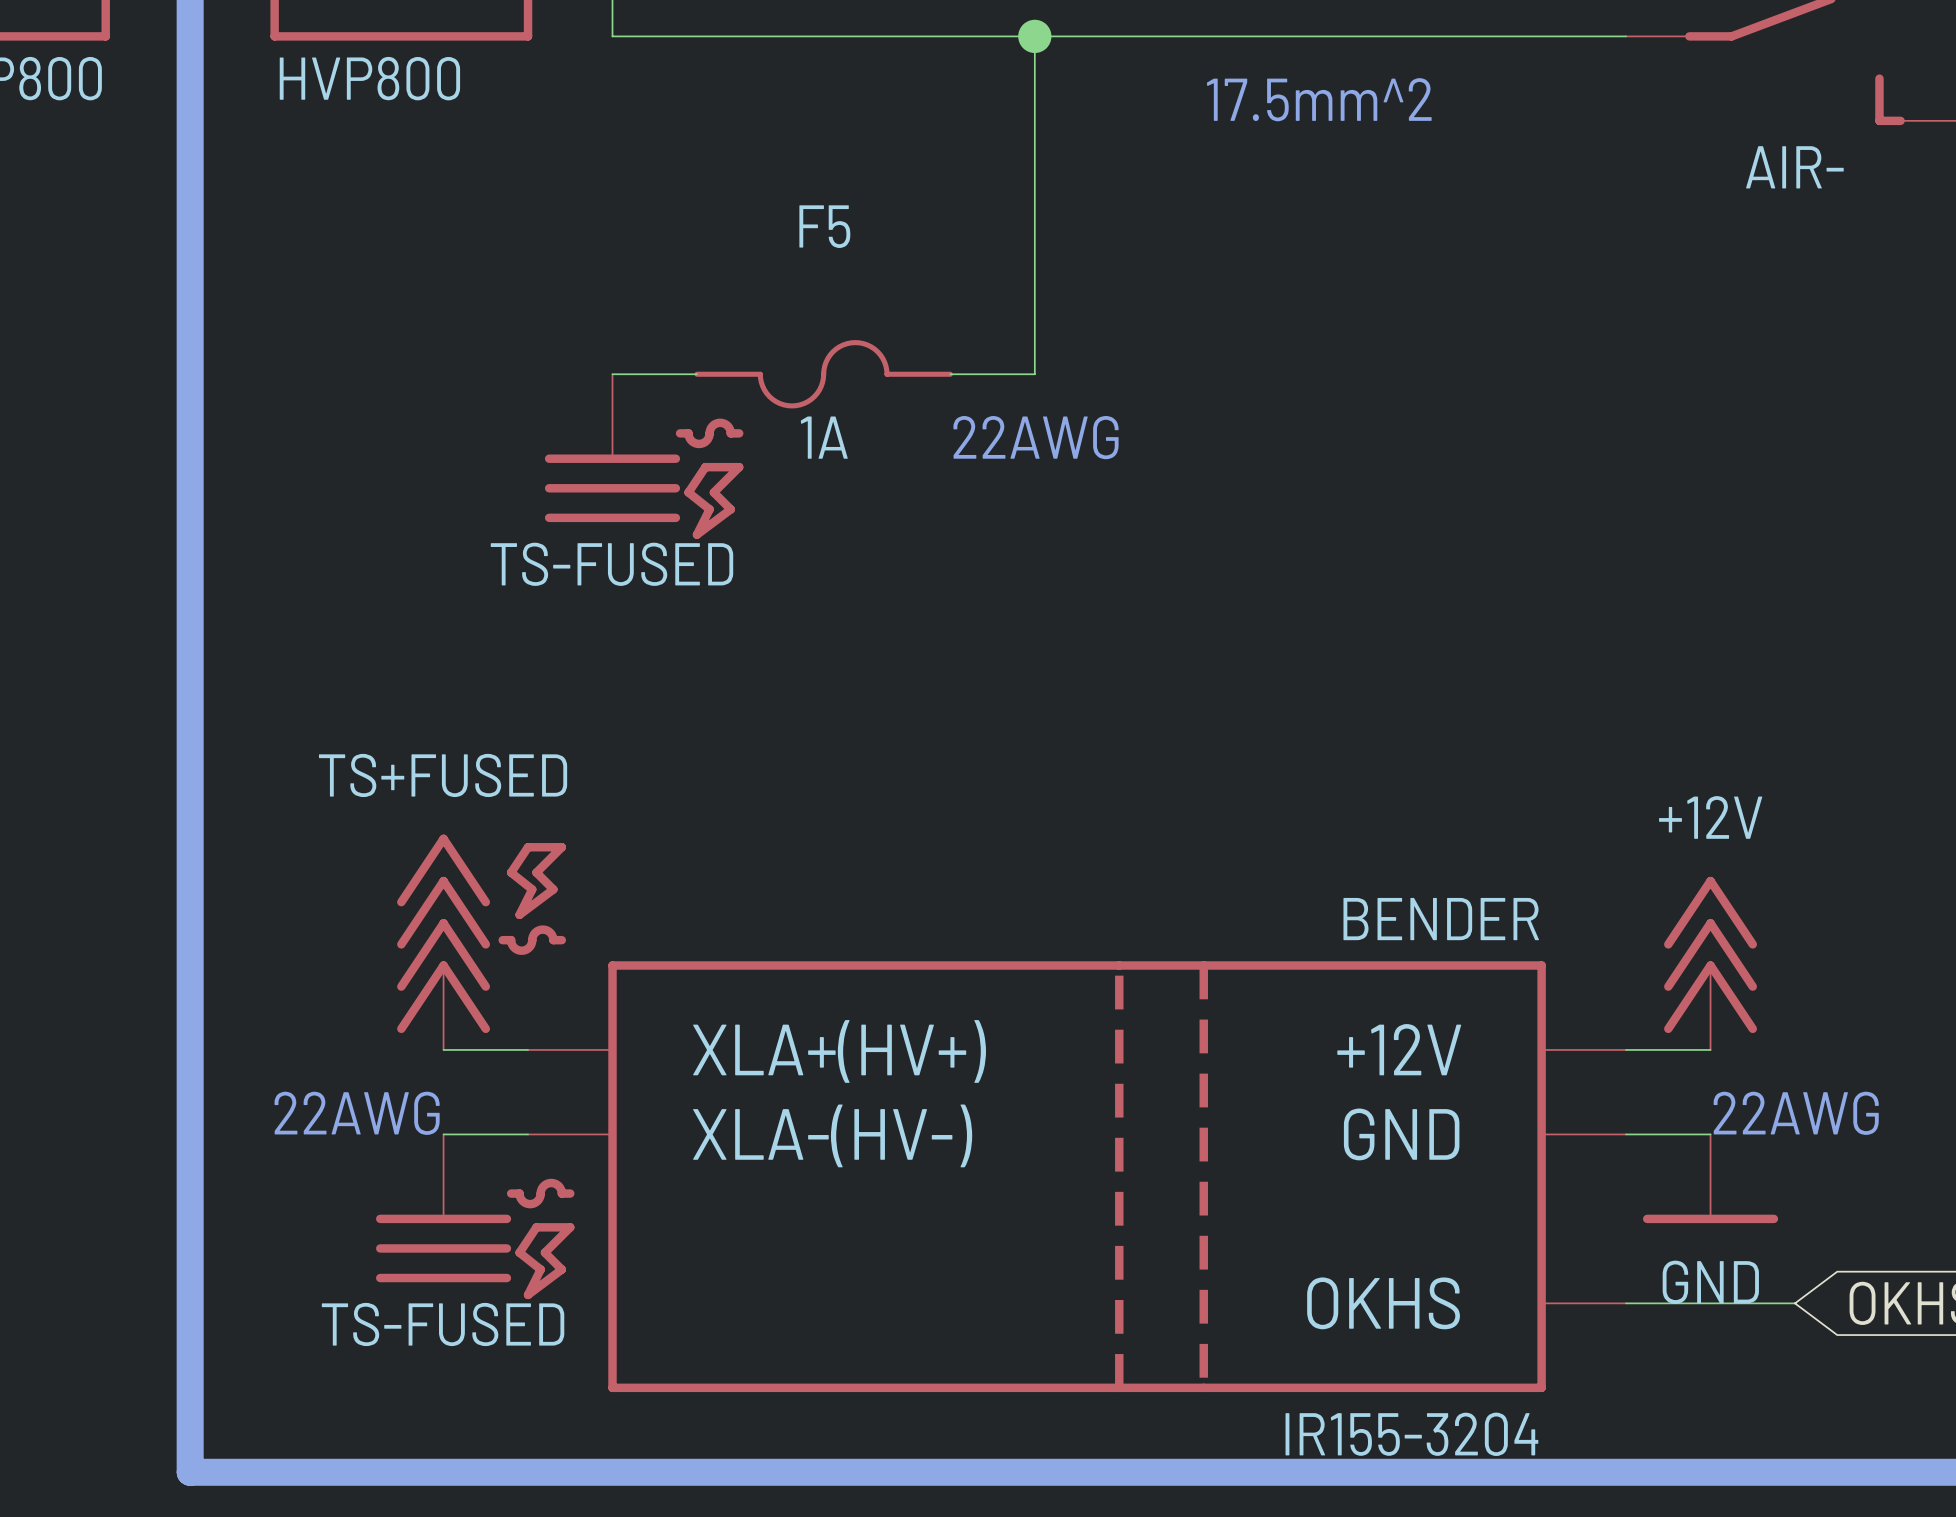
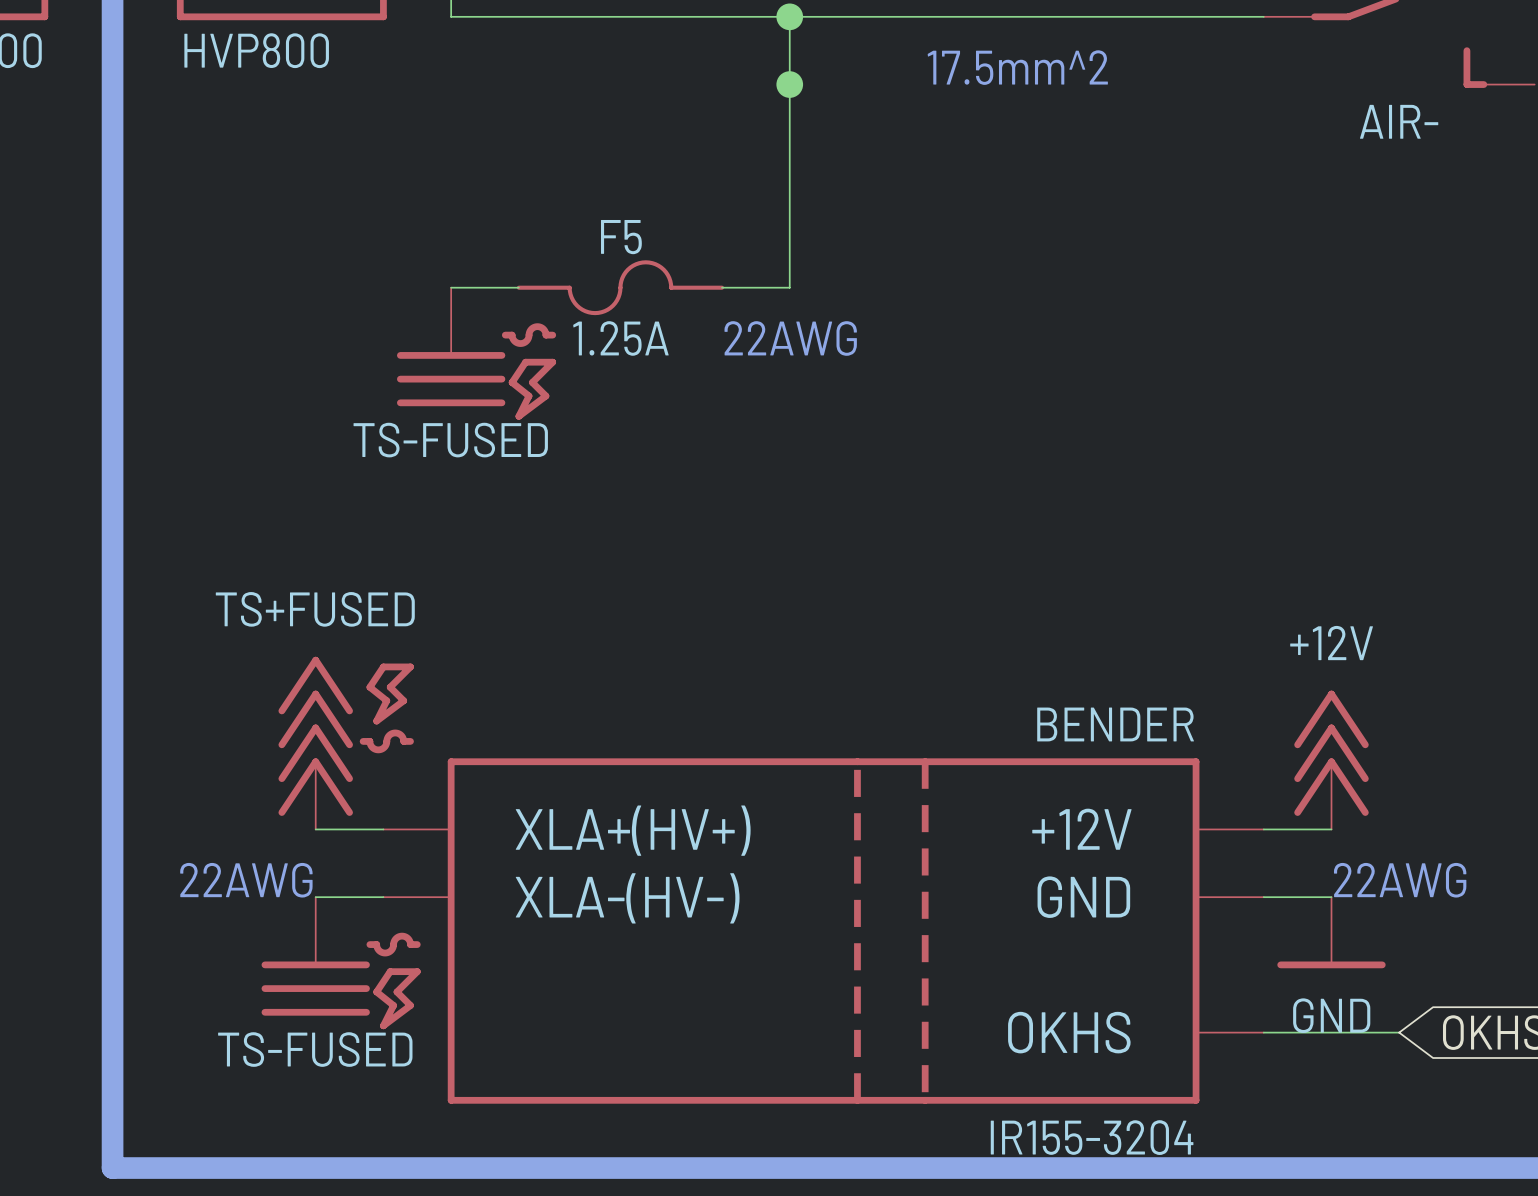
junction: none -> (789, 84)
F5 name position: F5 (824, 226) -> F5 (621, 237)
F5 value: 1A (824, 437) -> 1.25A (620, 338)

